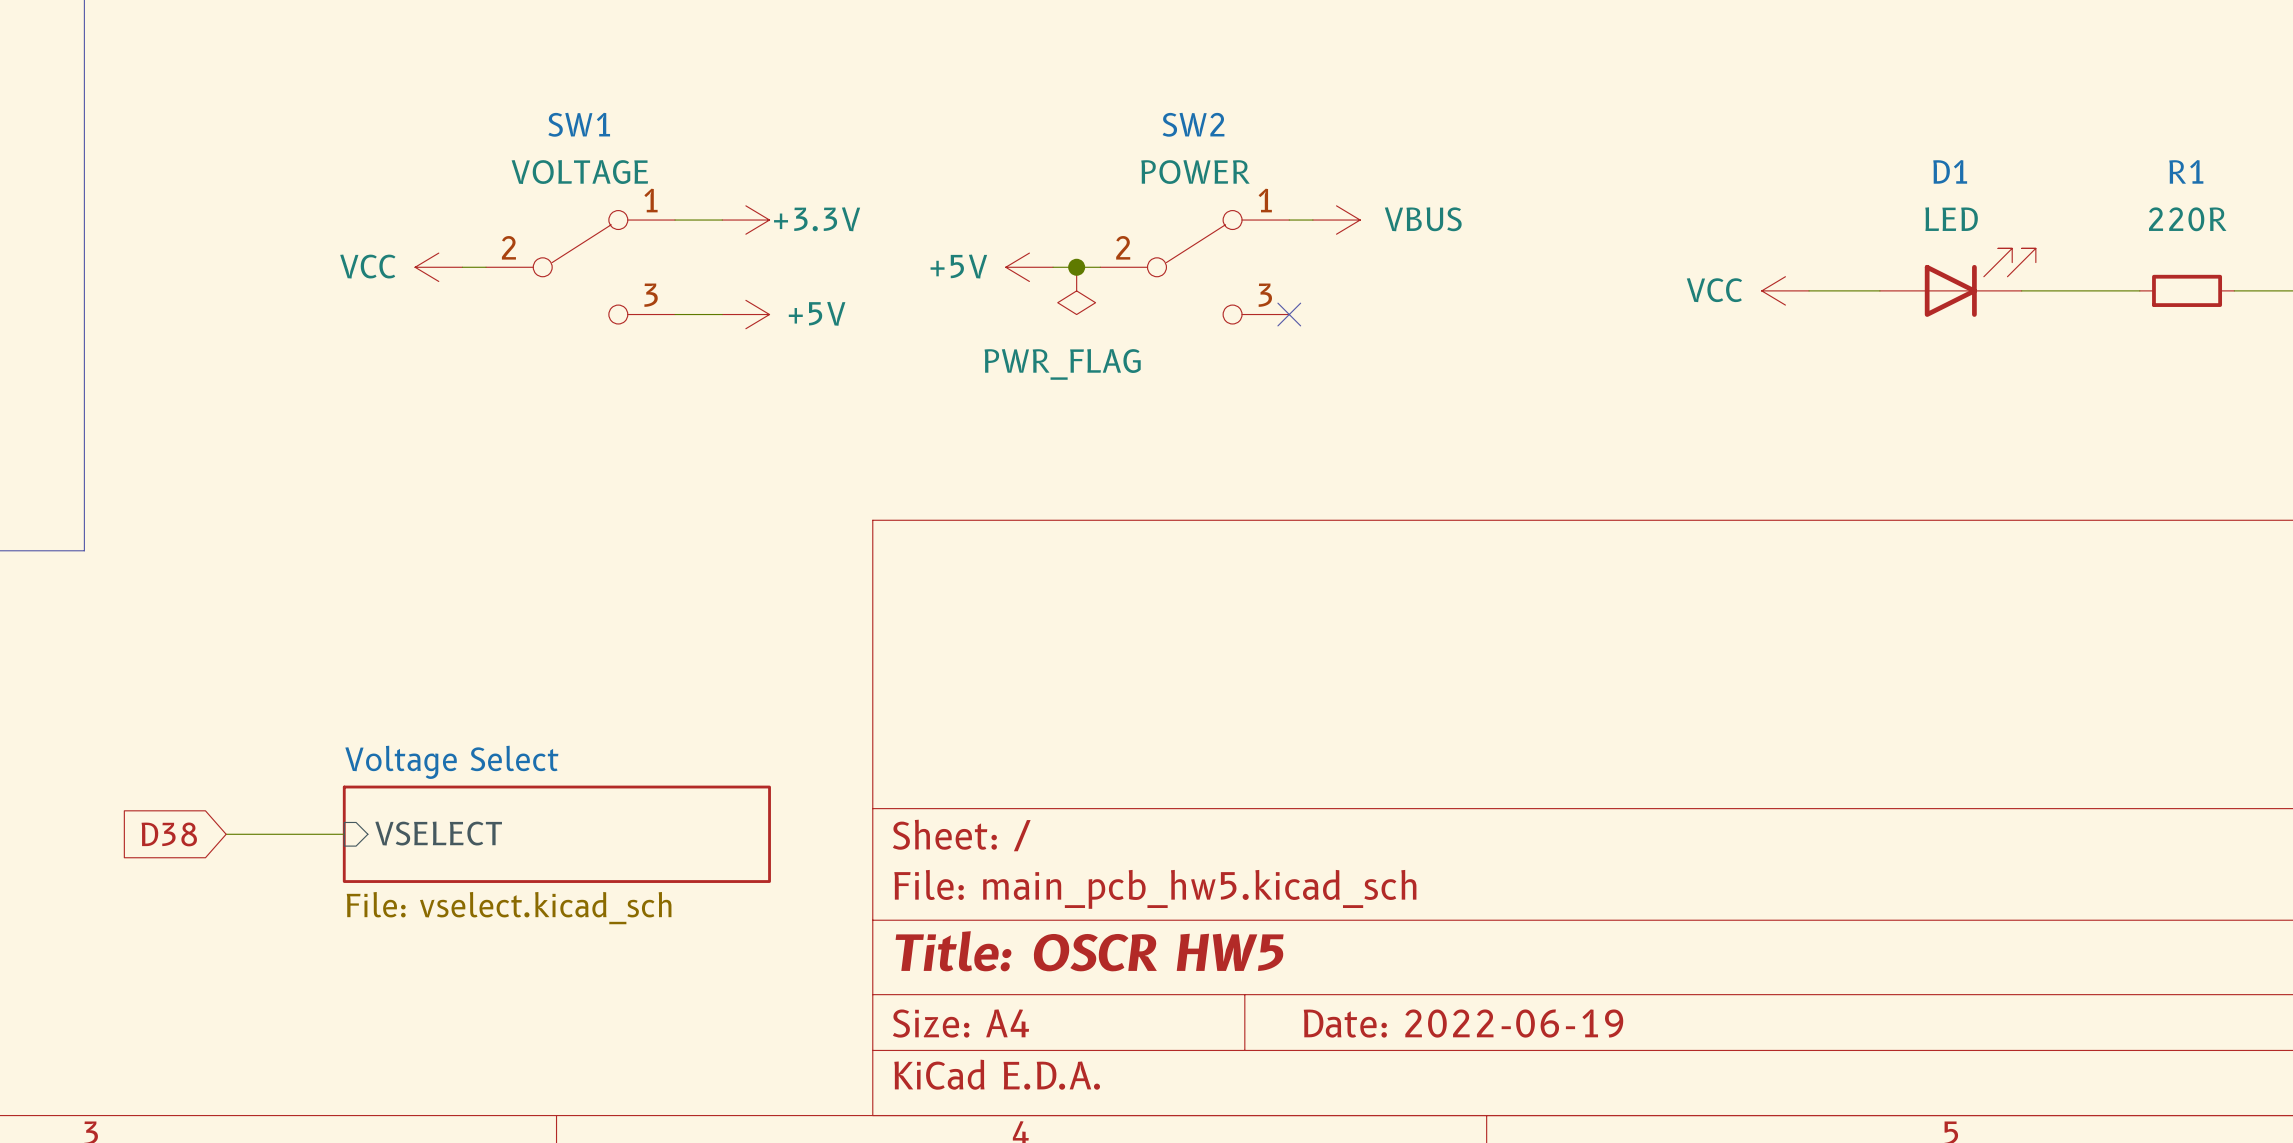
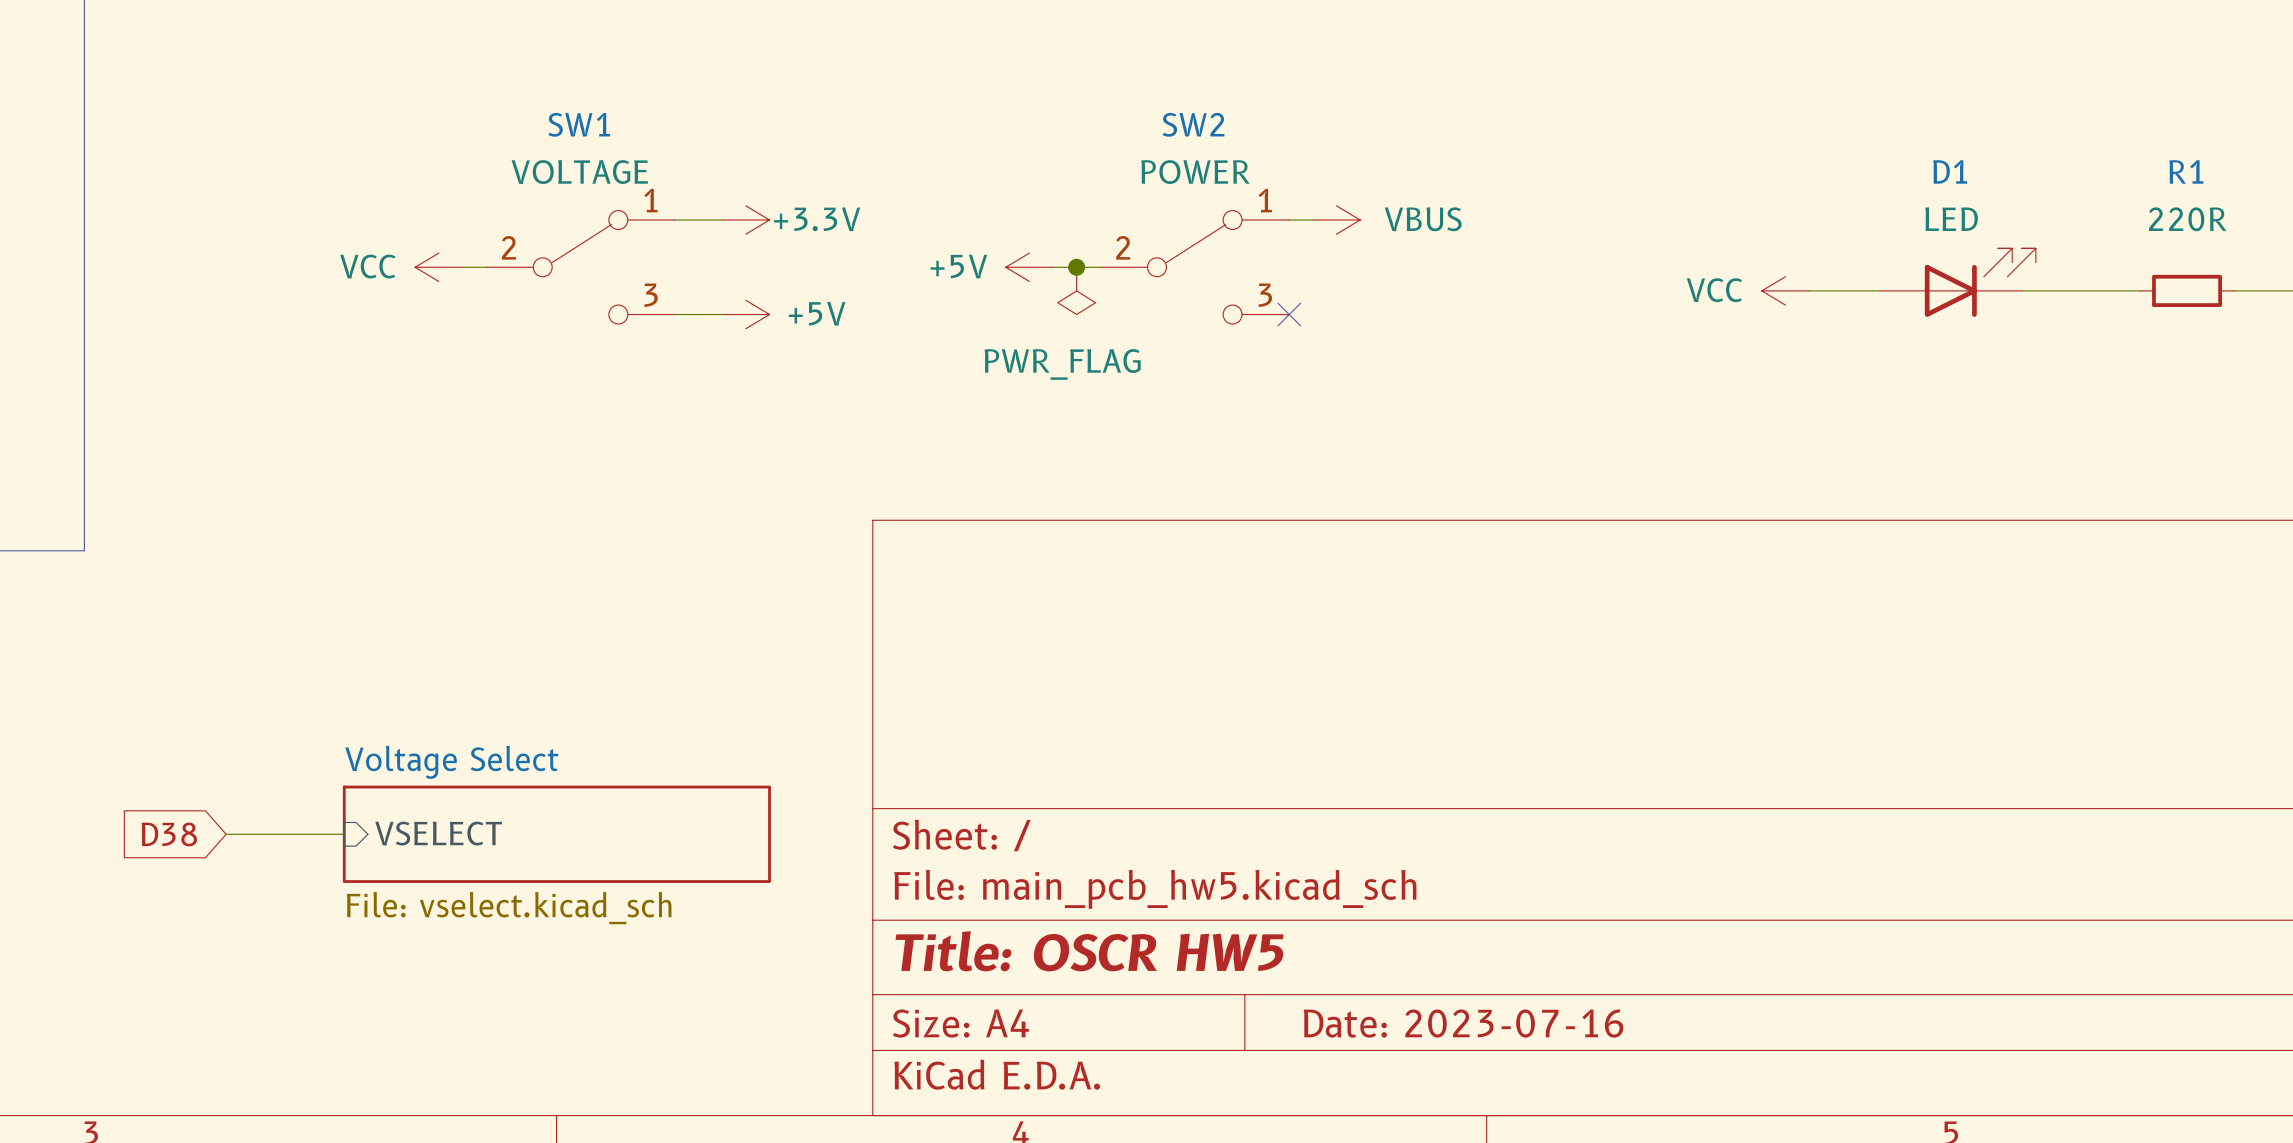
title block: Date: 2022-06-19 (1463, 1023) -> Date: 2023-07-16 (1463, 1023)

